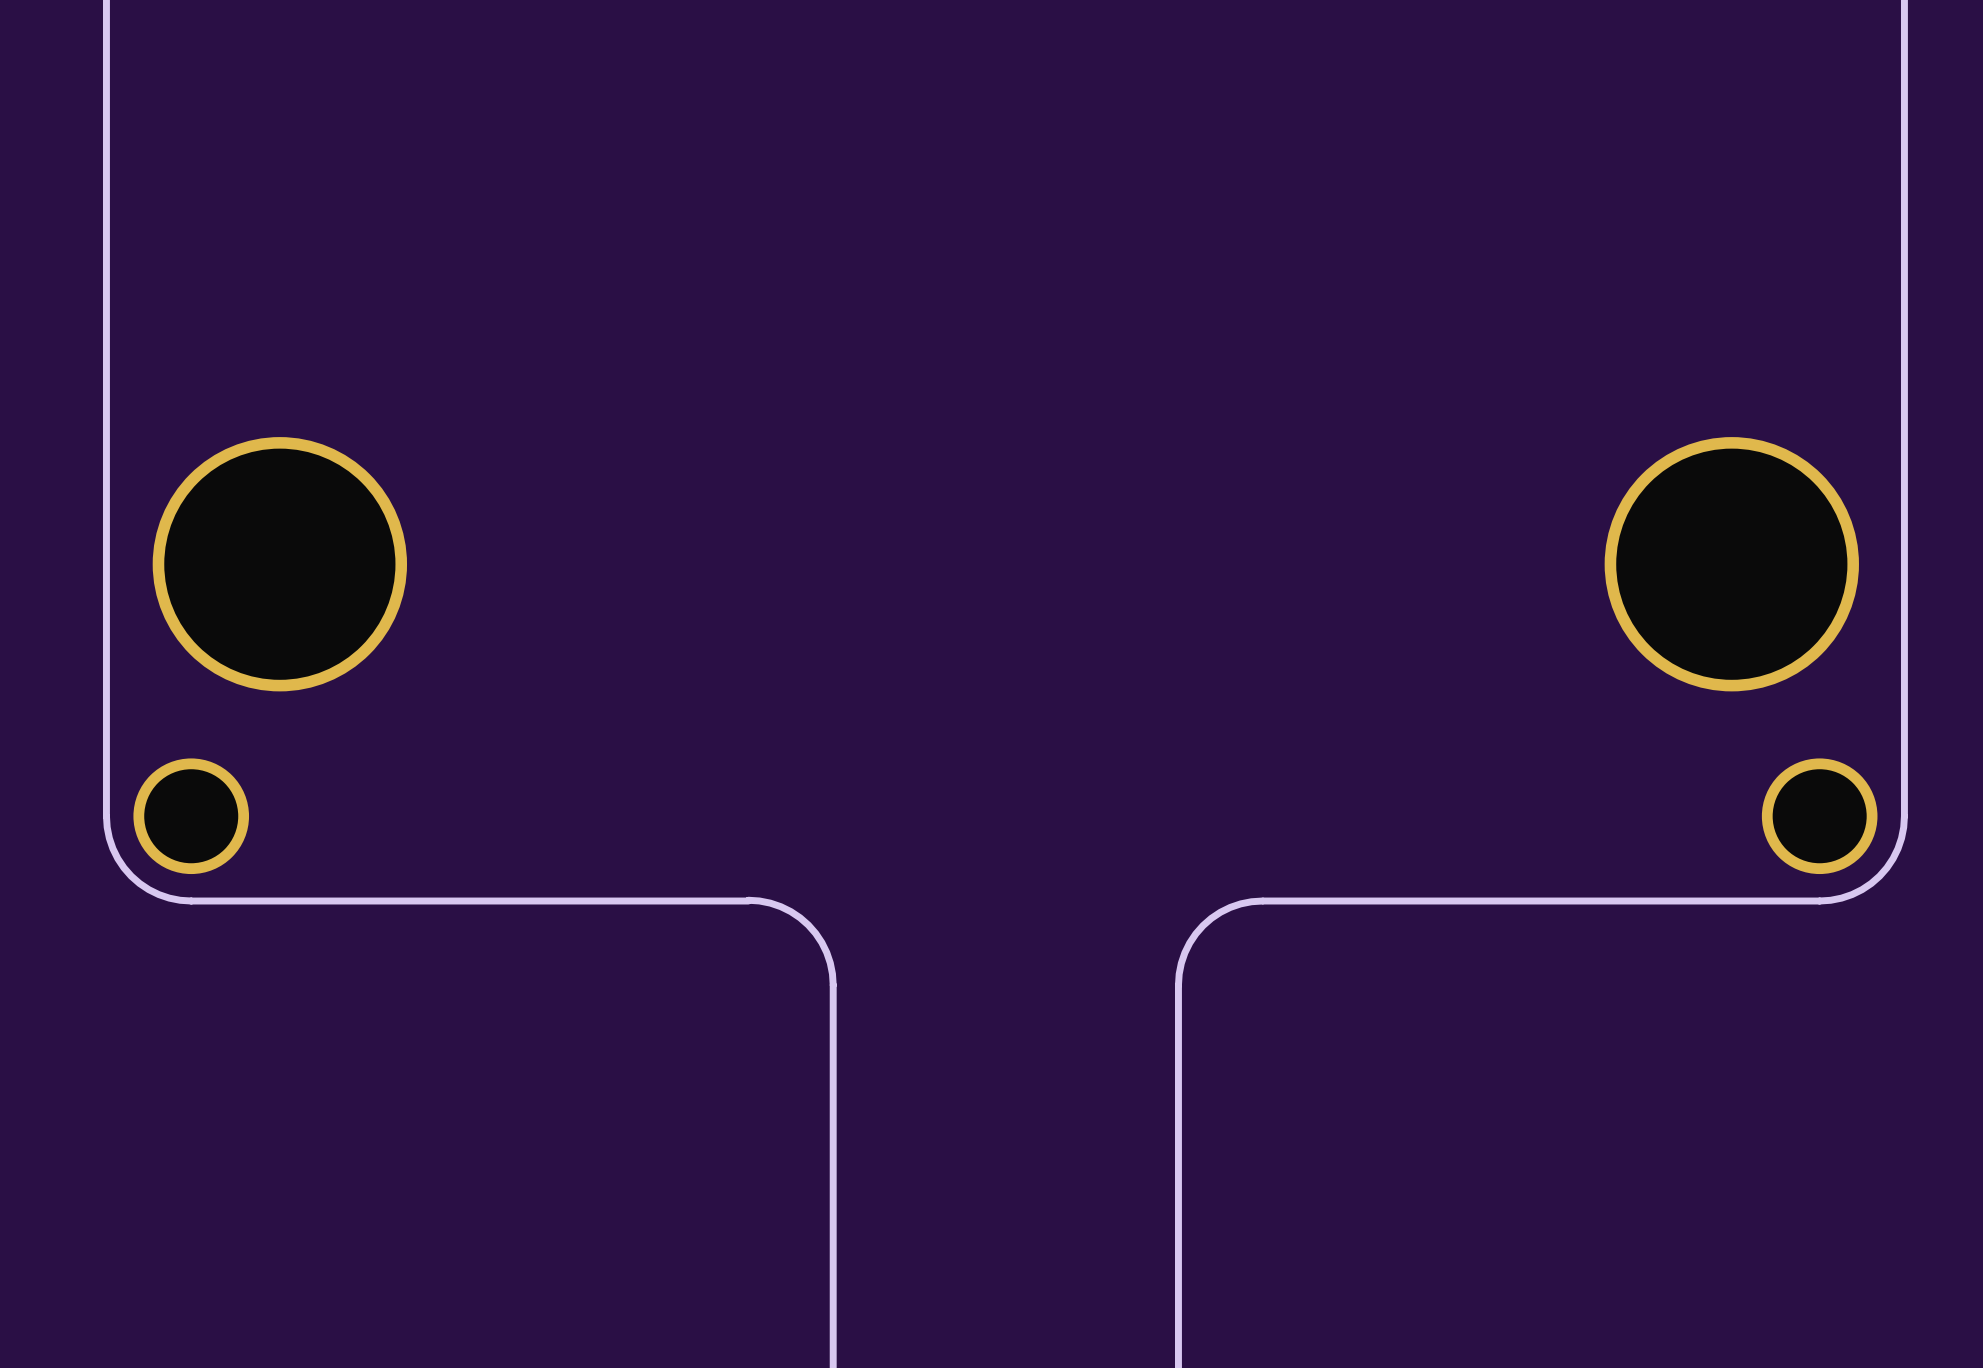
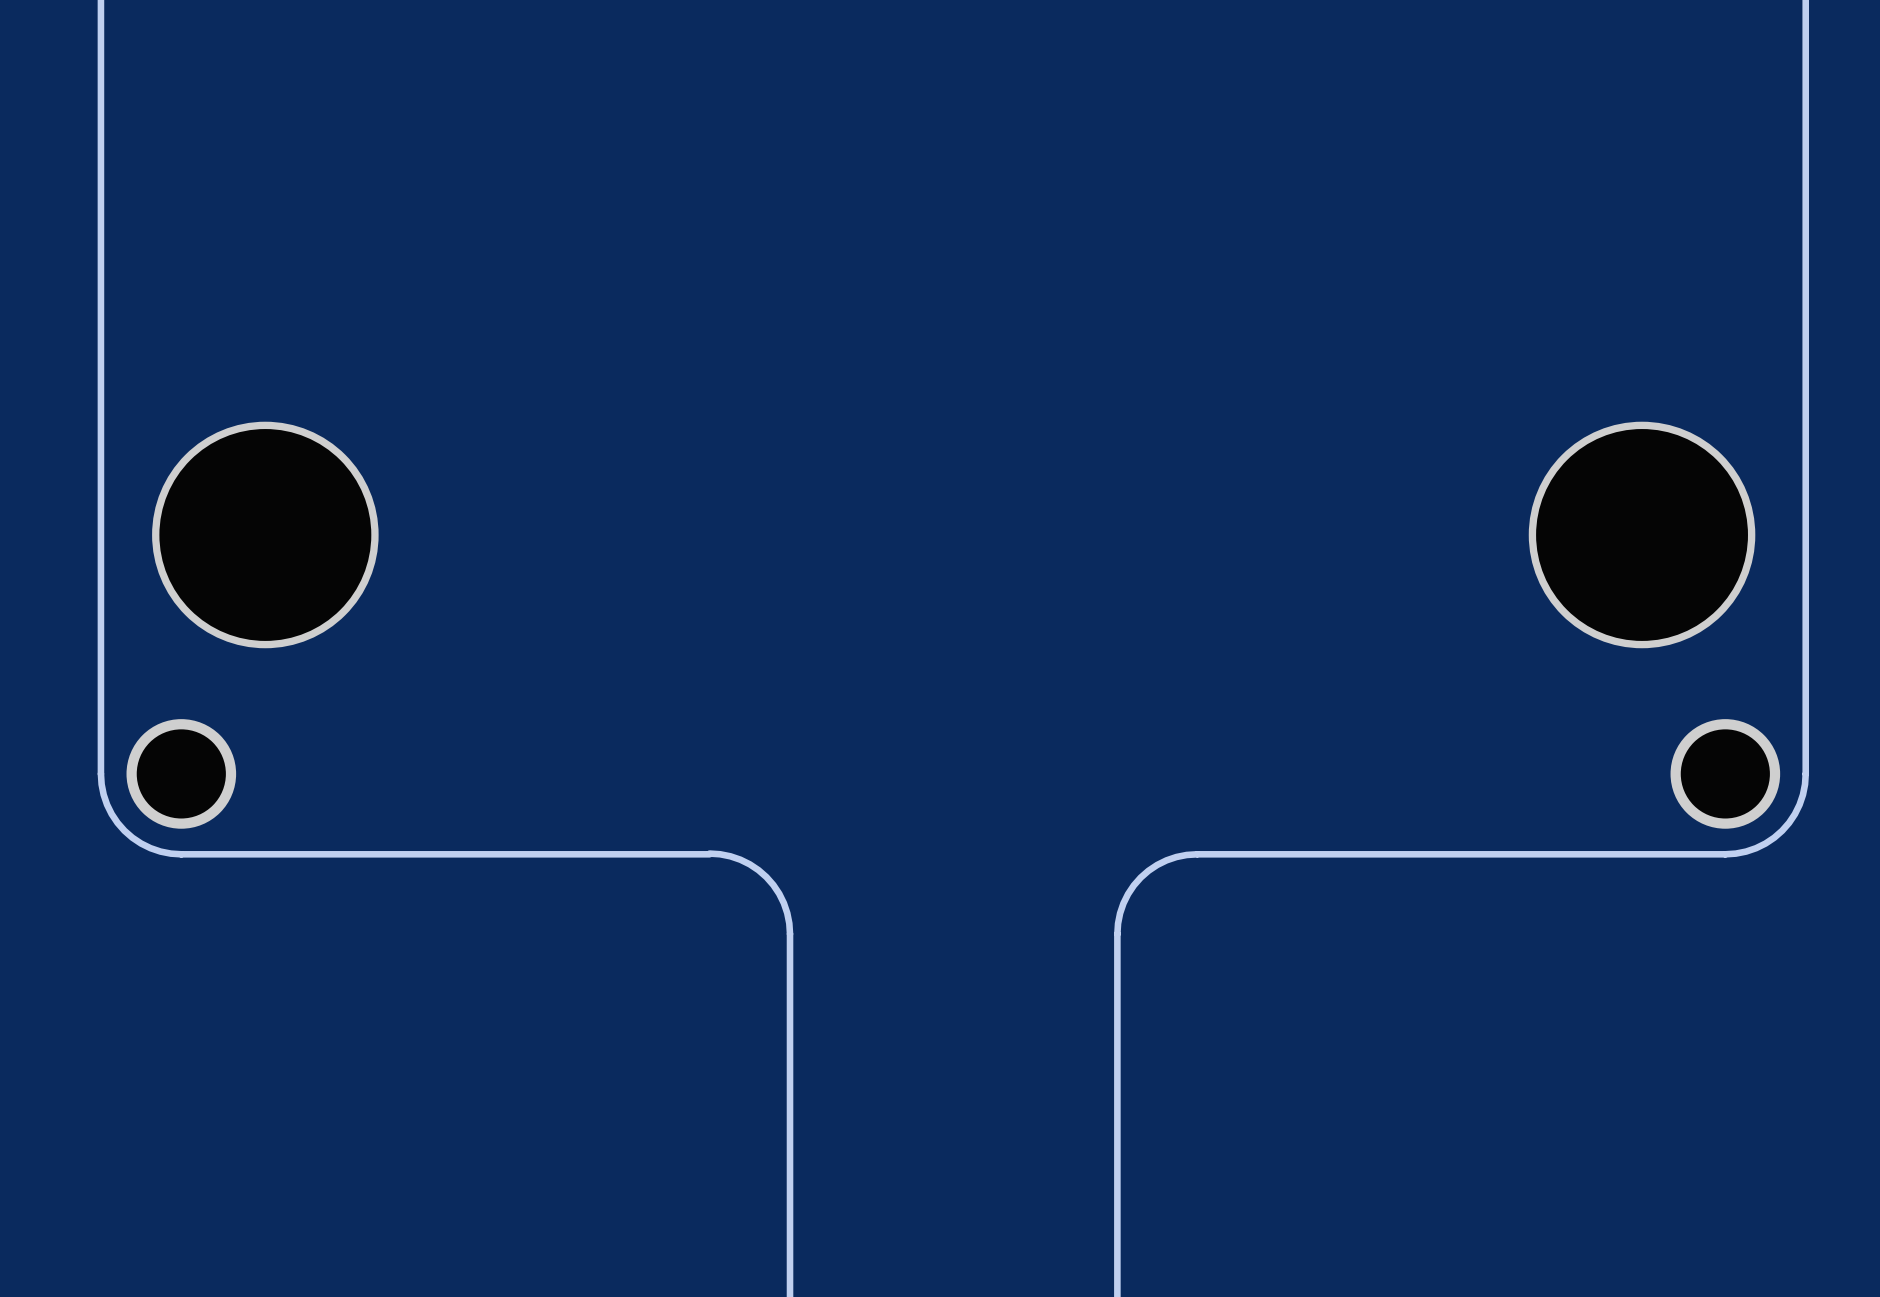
part footprint: [152, 437, 408, 692] -> [152, 421, 379, 649]
part footprint: [1604, 437, 1859, 692] -> [1528, 421, 1756, 649]

